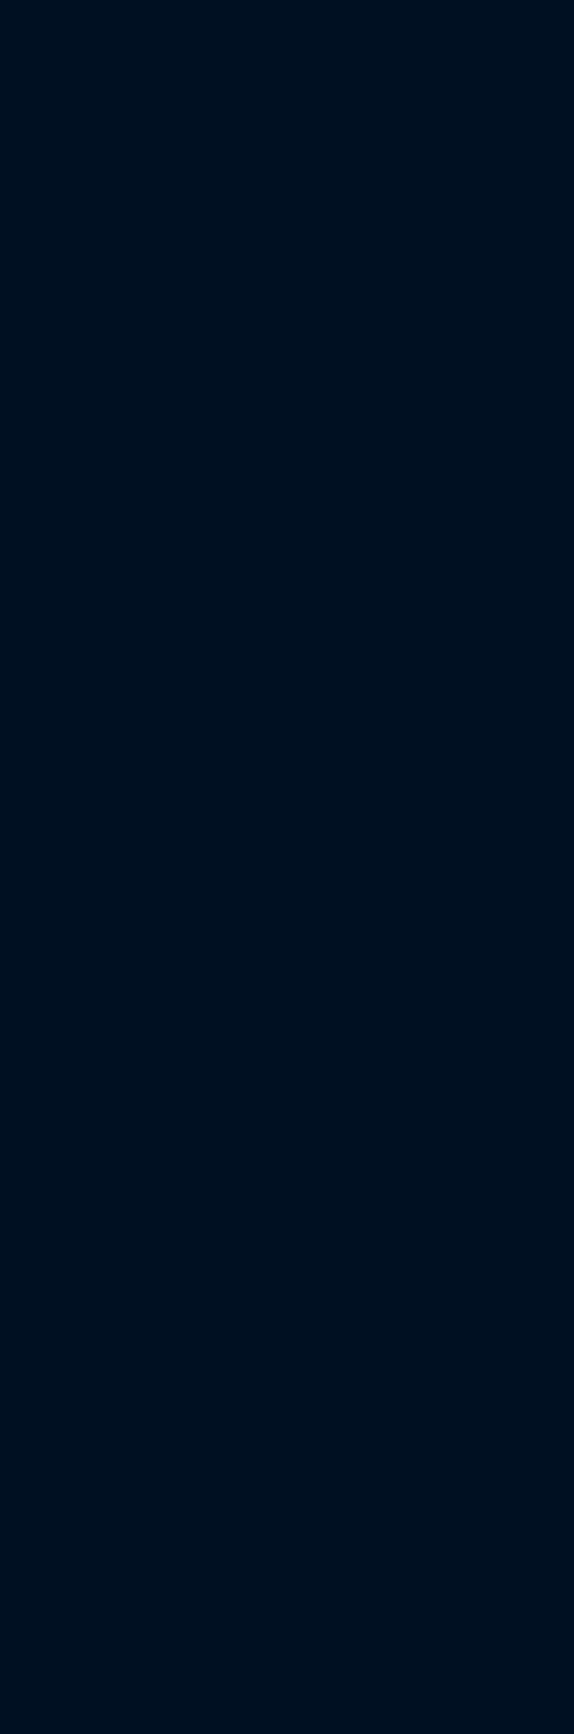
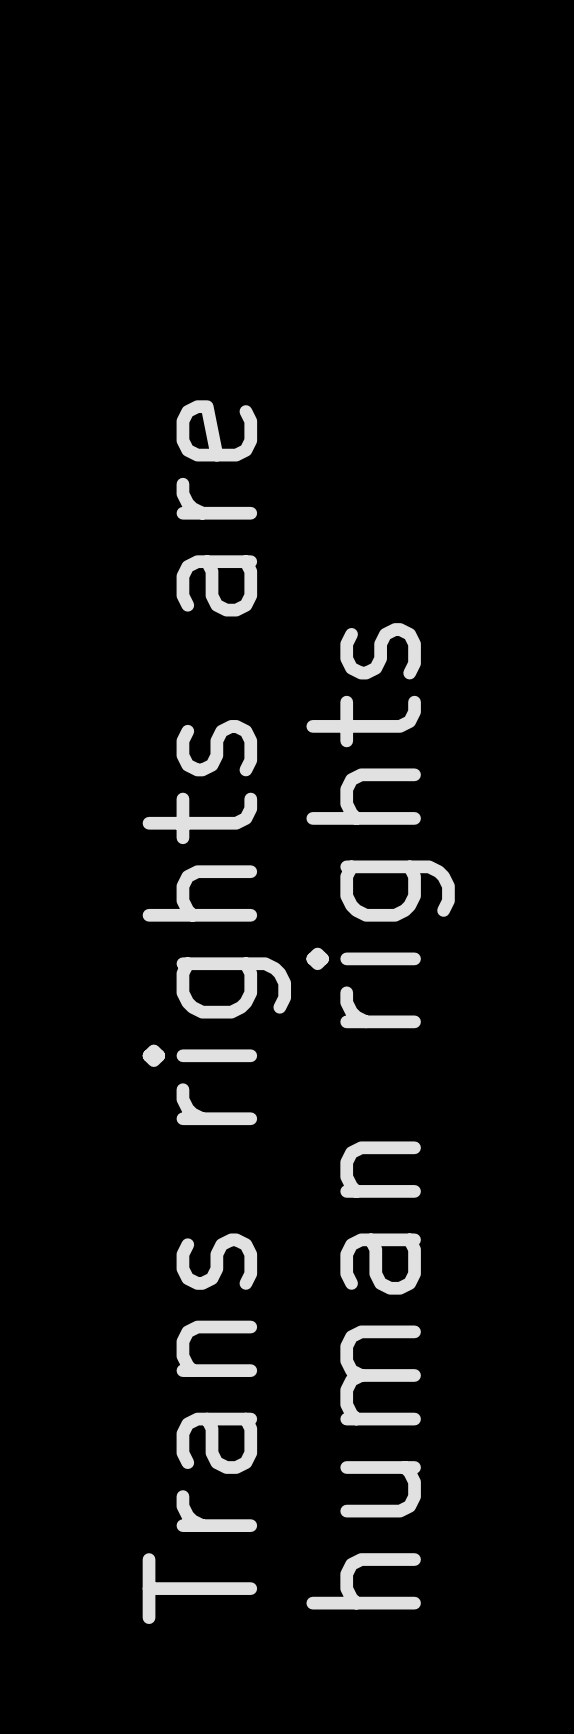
text: none -> Trans rights are (216, 1012)
text: none -> human rights (380, 1116)

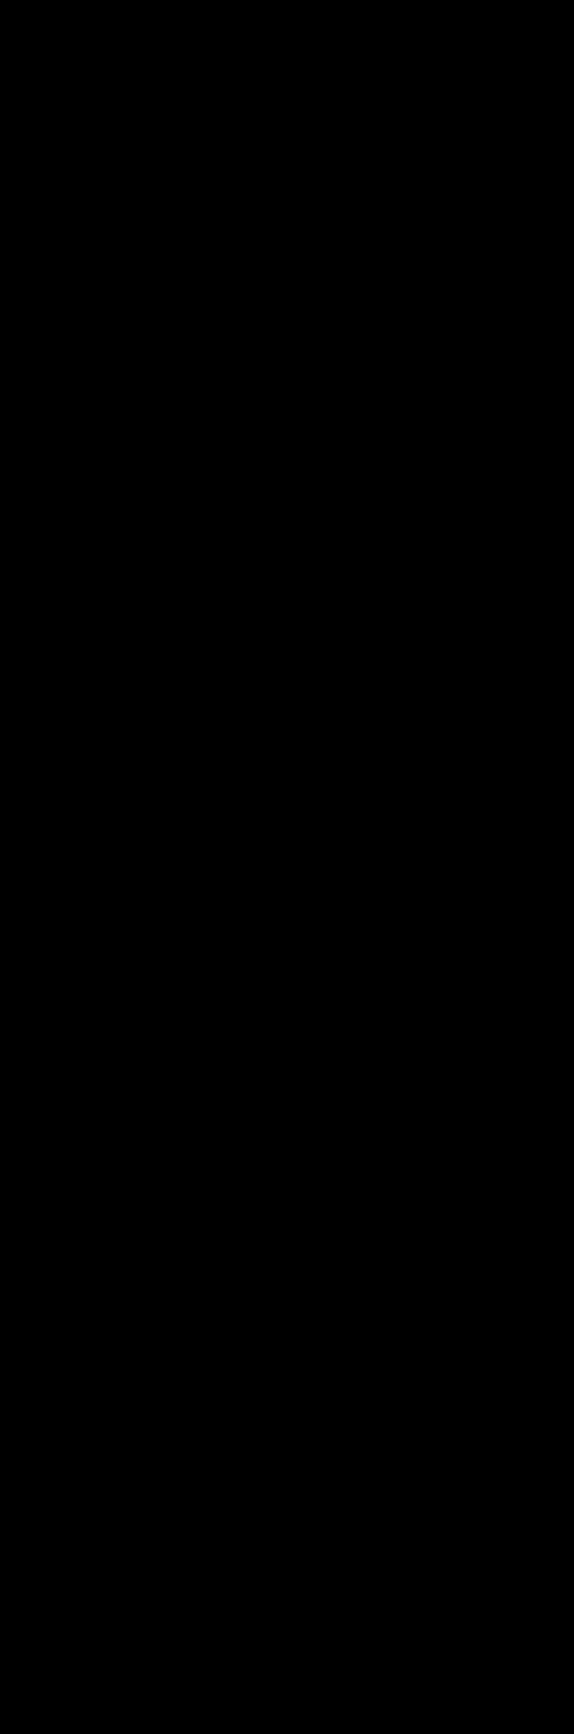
text: Trans rights are (216, 1012) -> none
text: human rights (380, 1116) -> none

